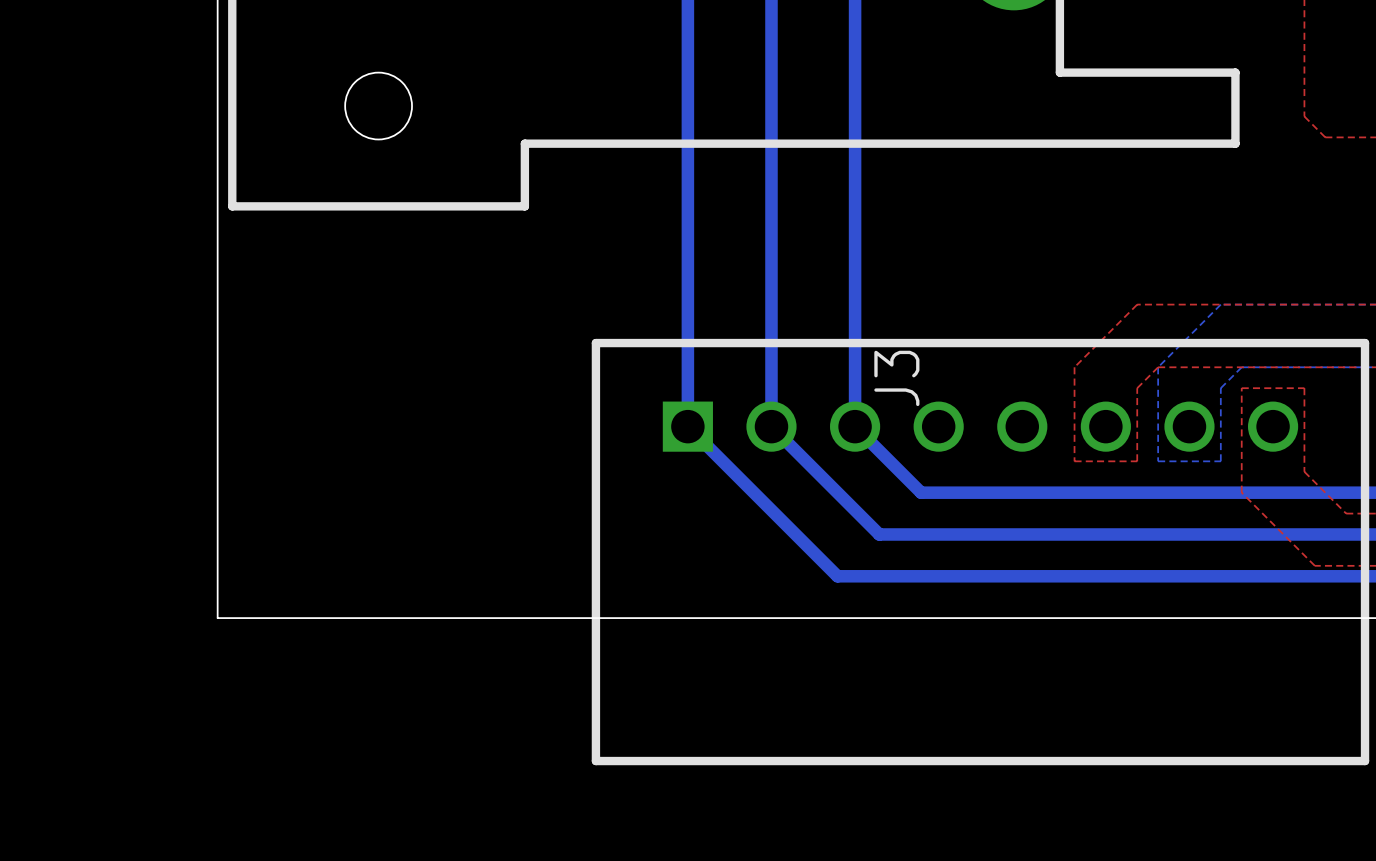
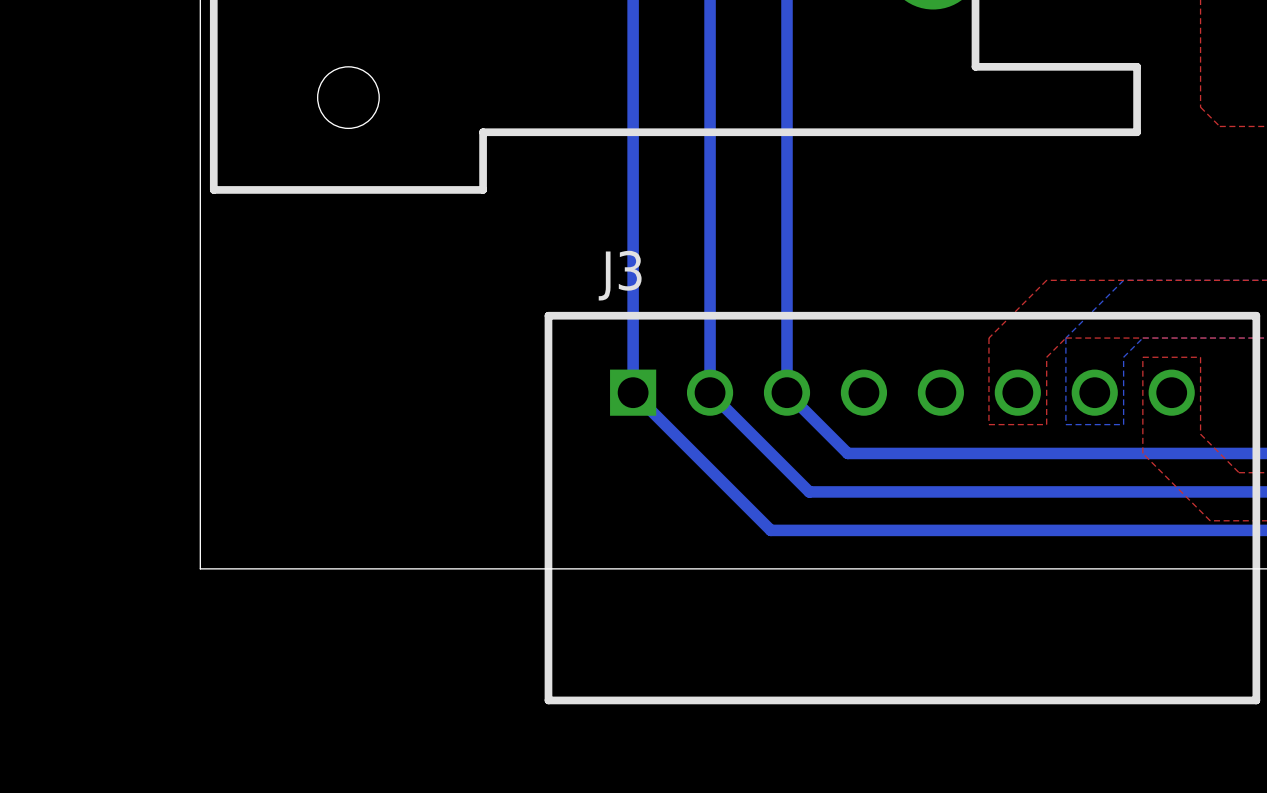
J3 name rotation: 0° (896, 378) -> 90° clockwise (620, 275)
J3 name position: J3 (896, 378) -> J3 (620, 275)

